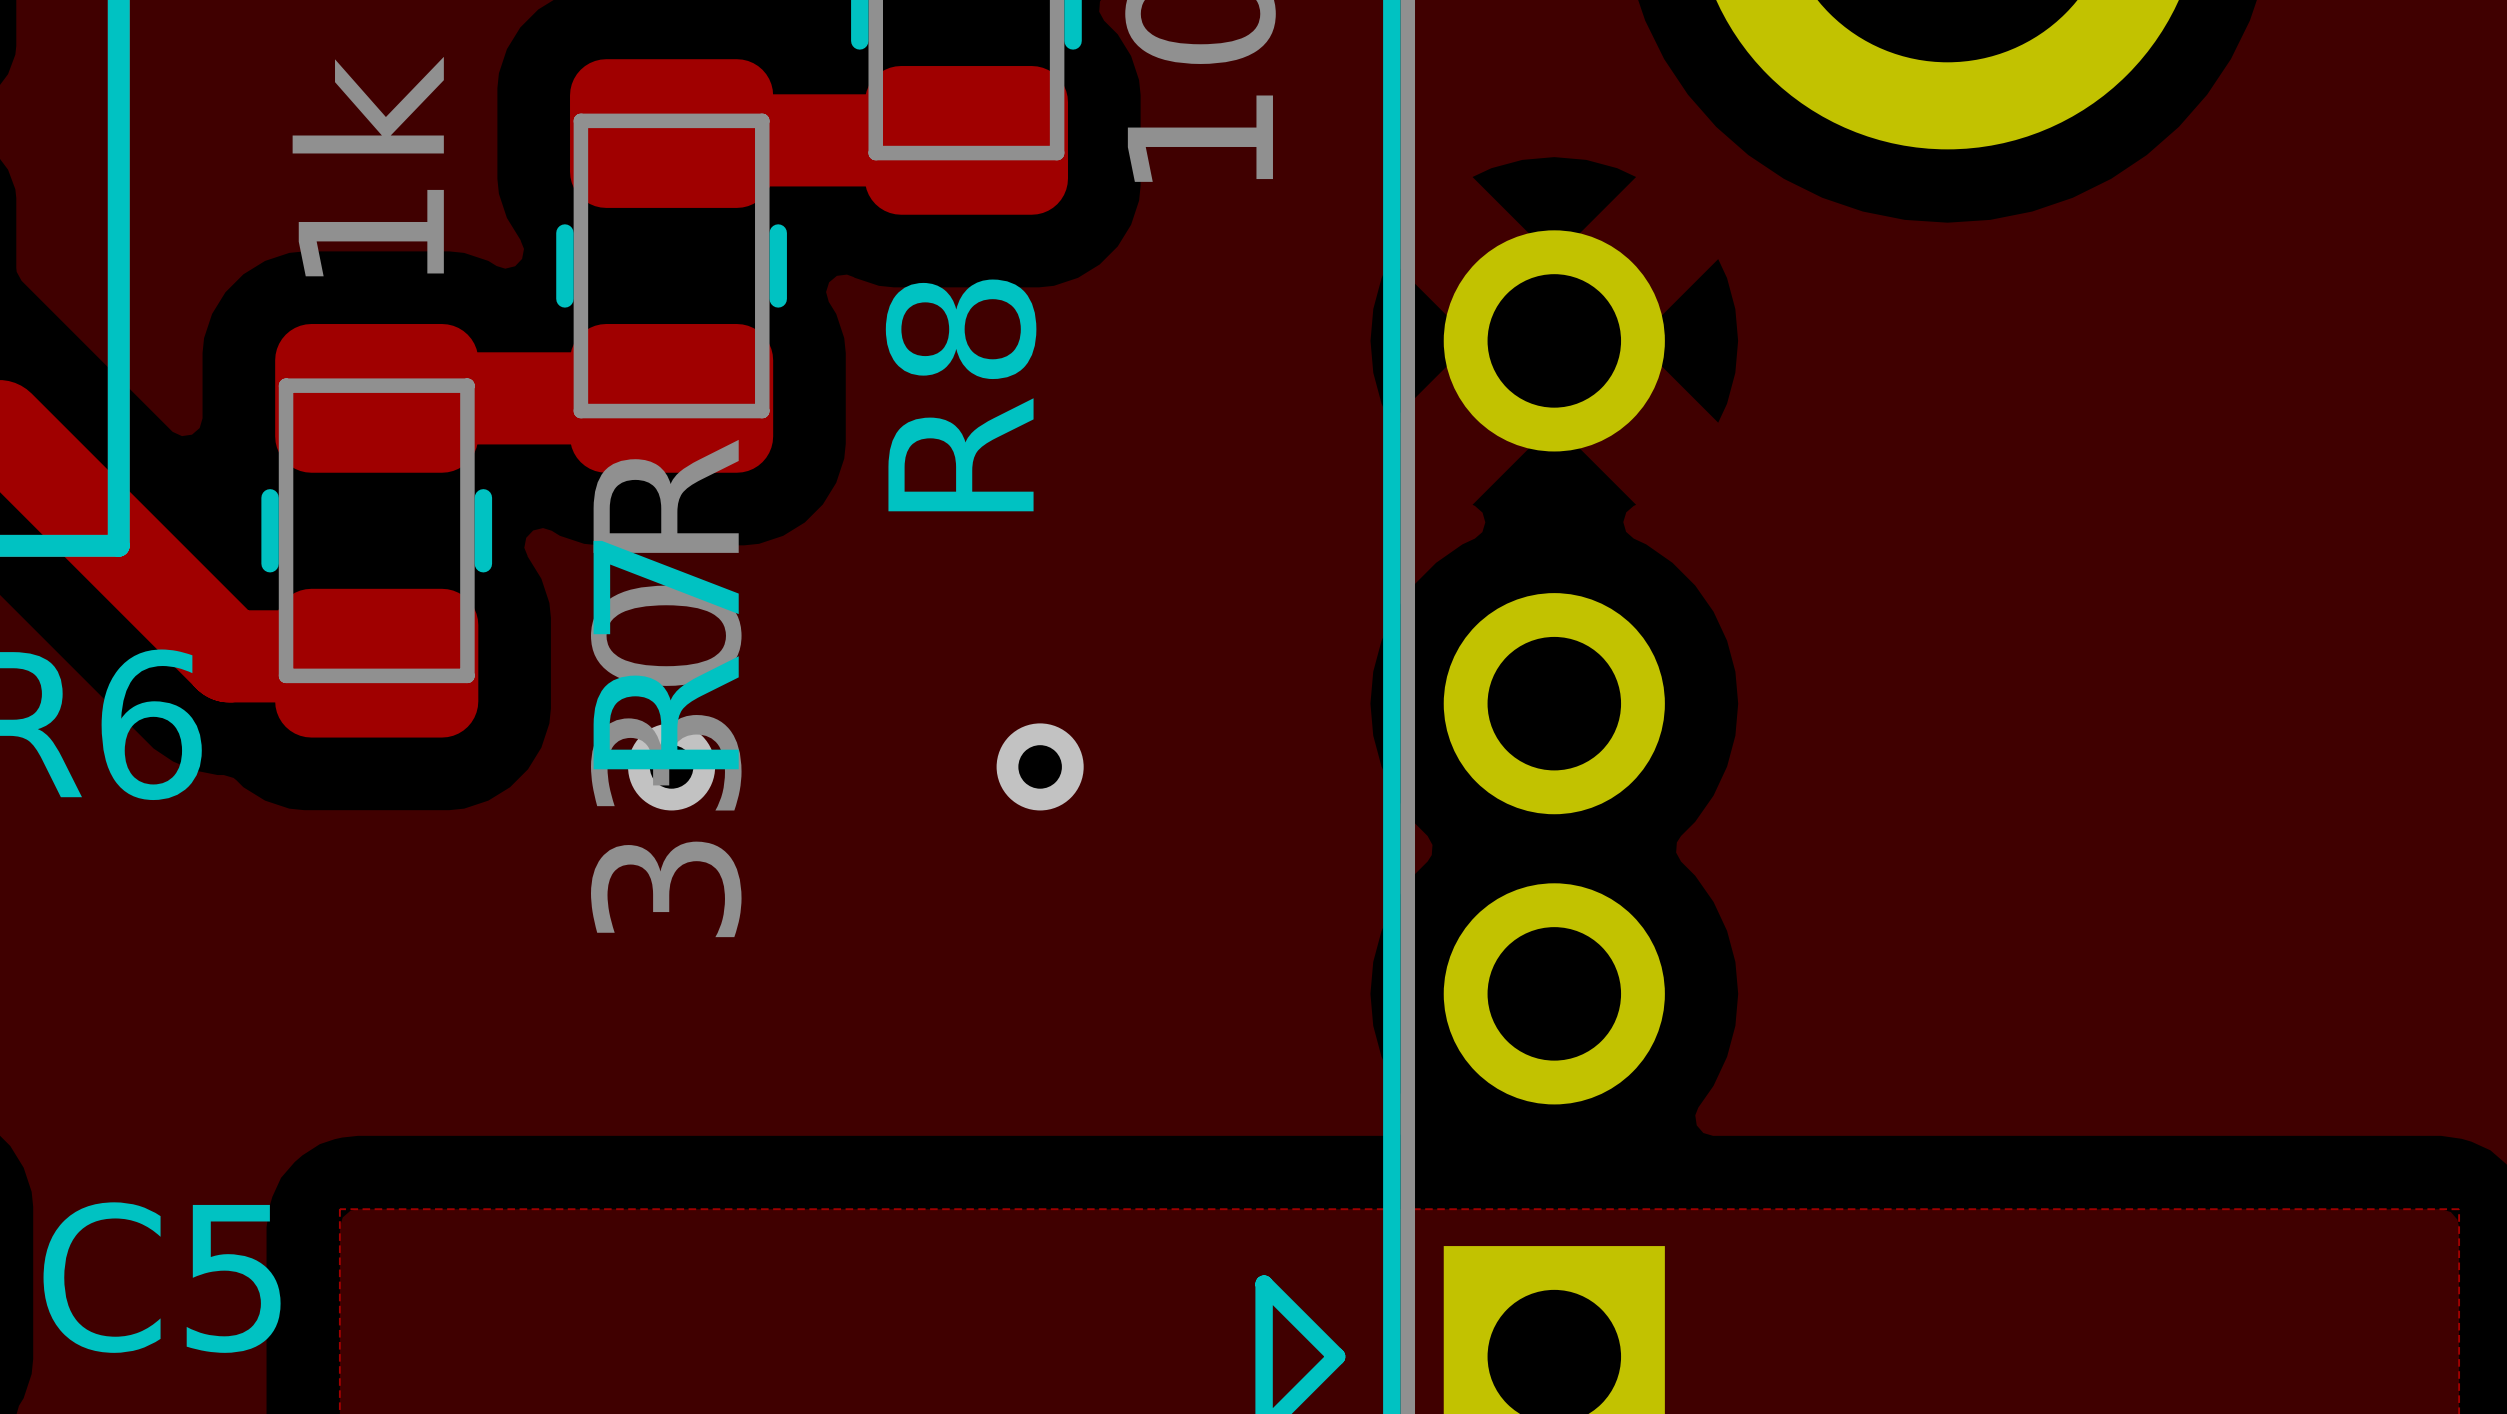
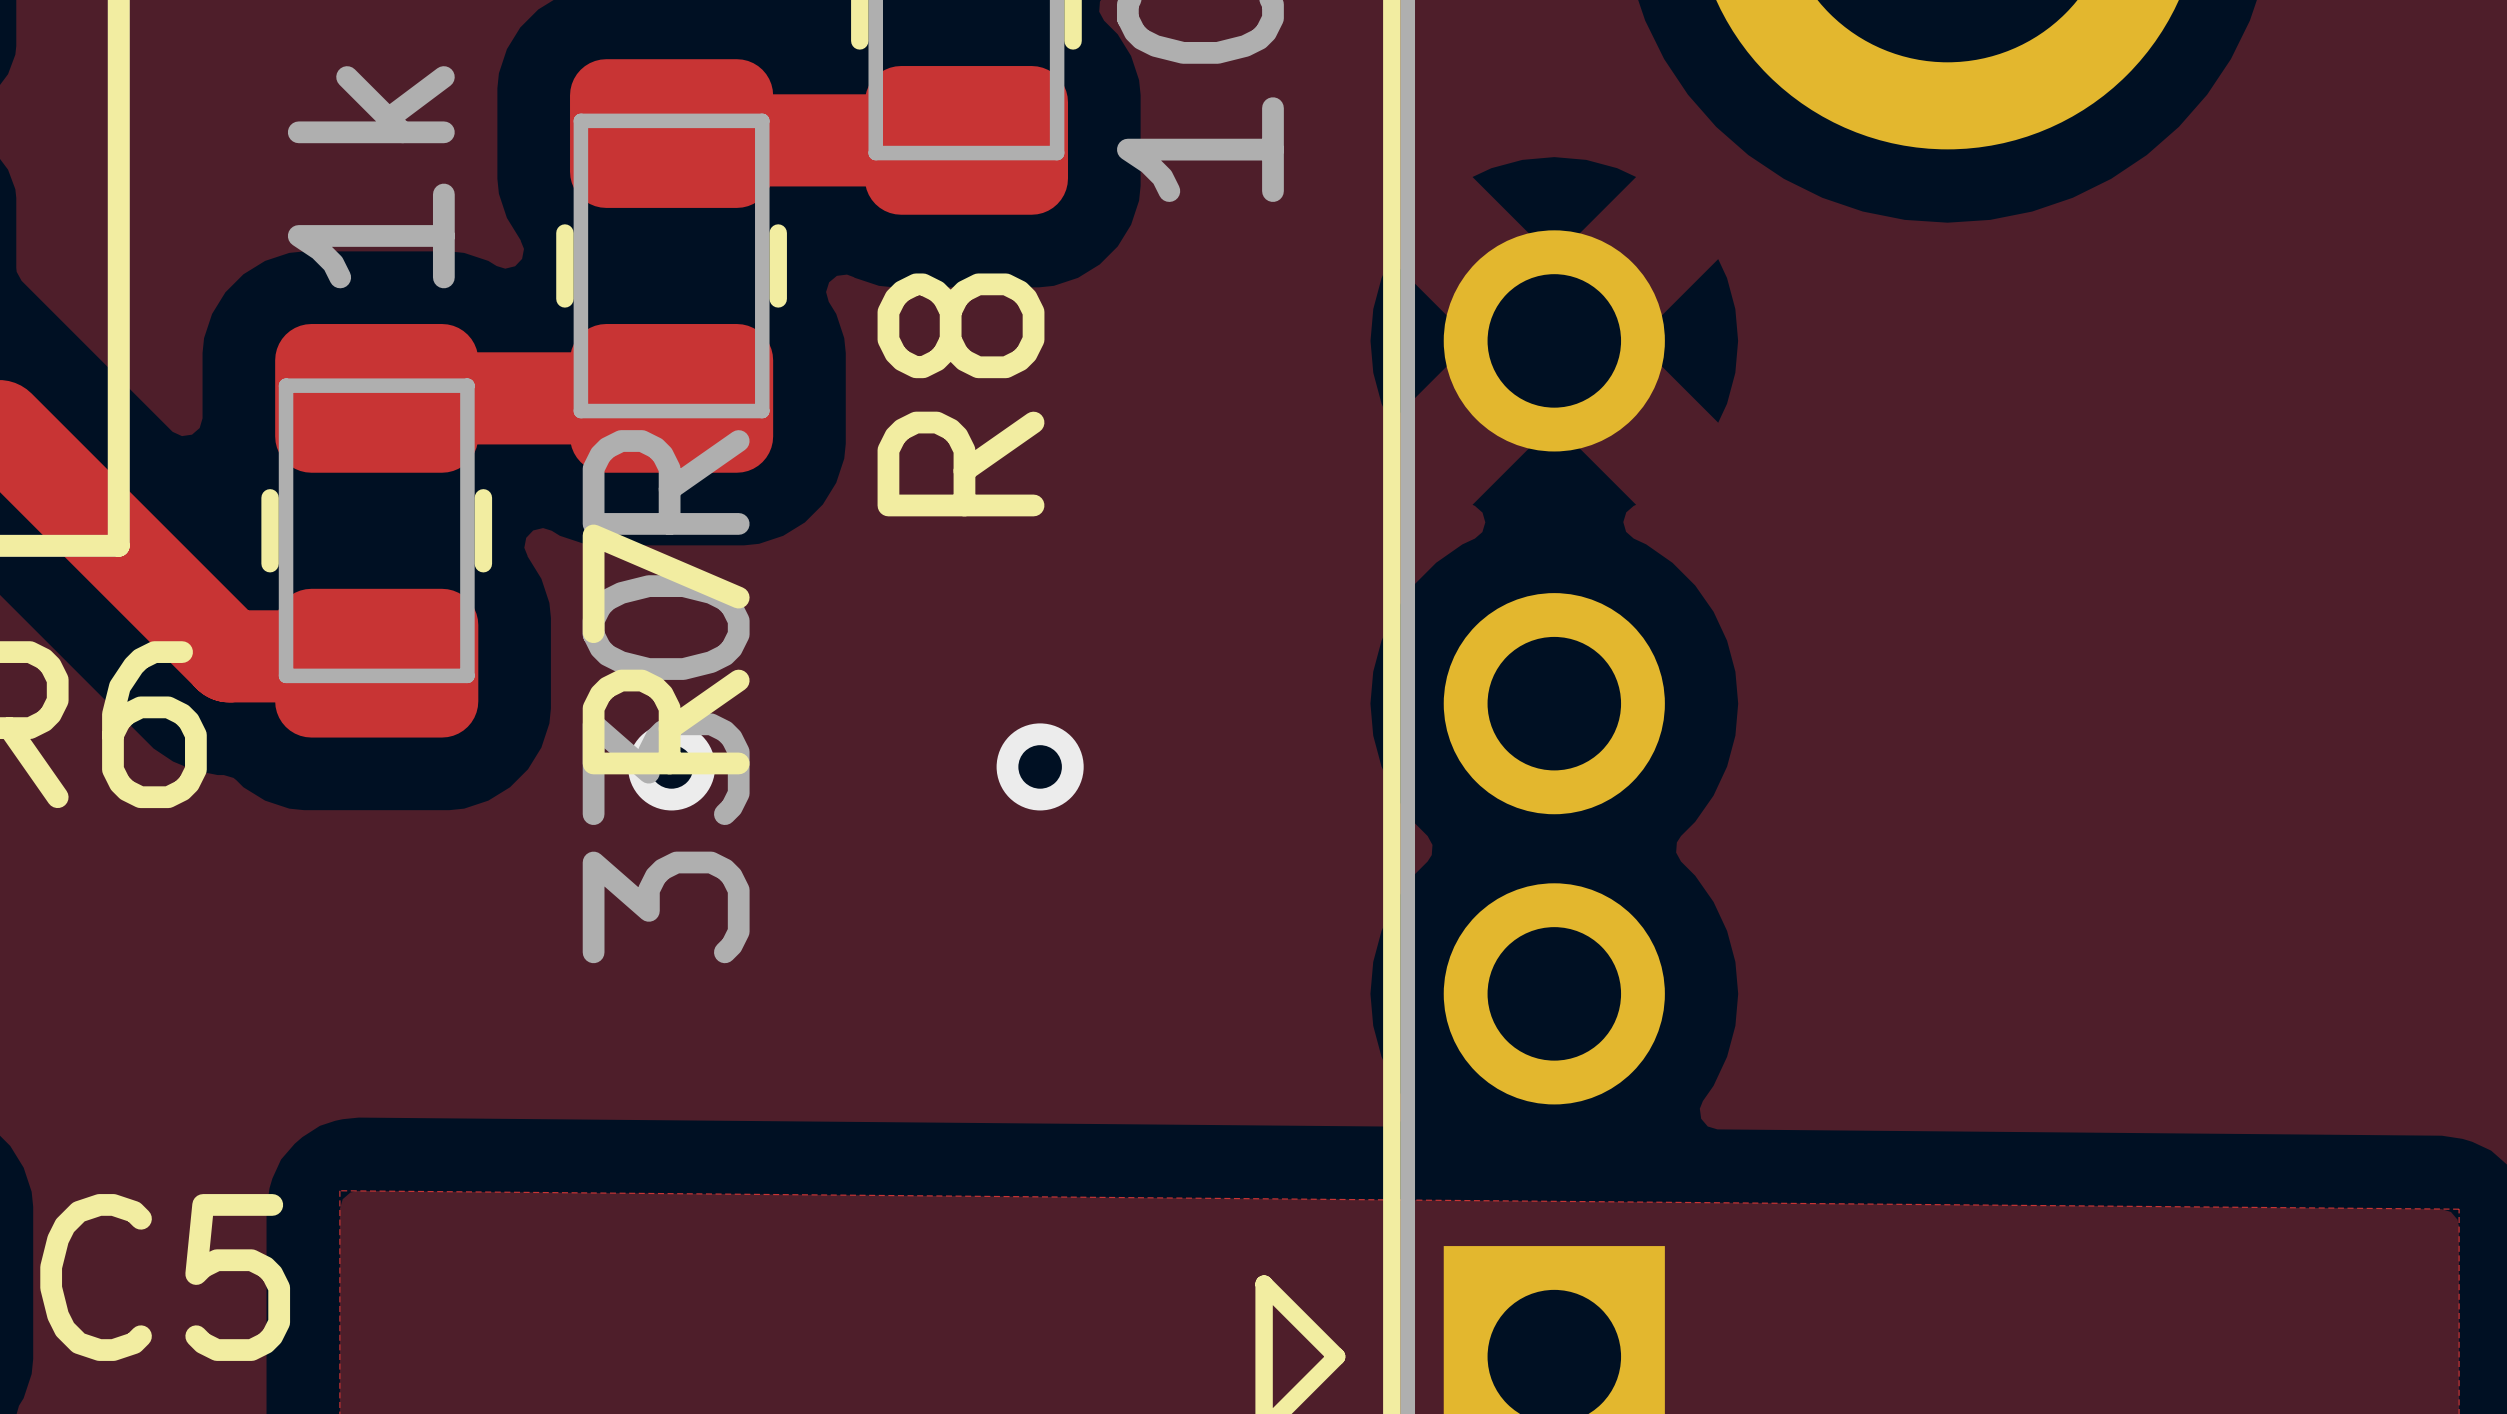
zone outline: (339, 1209) (2459, 1209) -> (339, 1209) (339, 1190) (2459, 1209)

